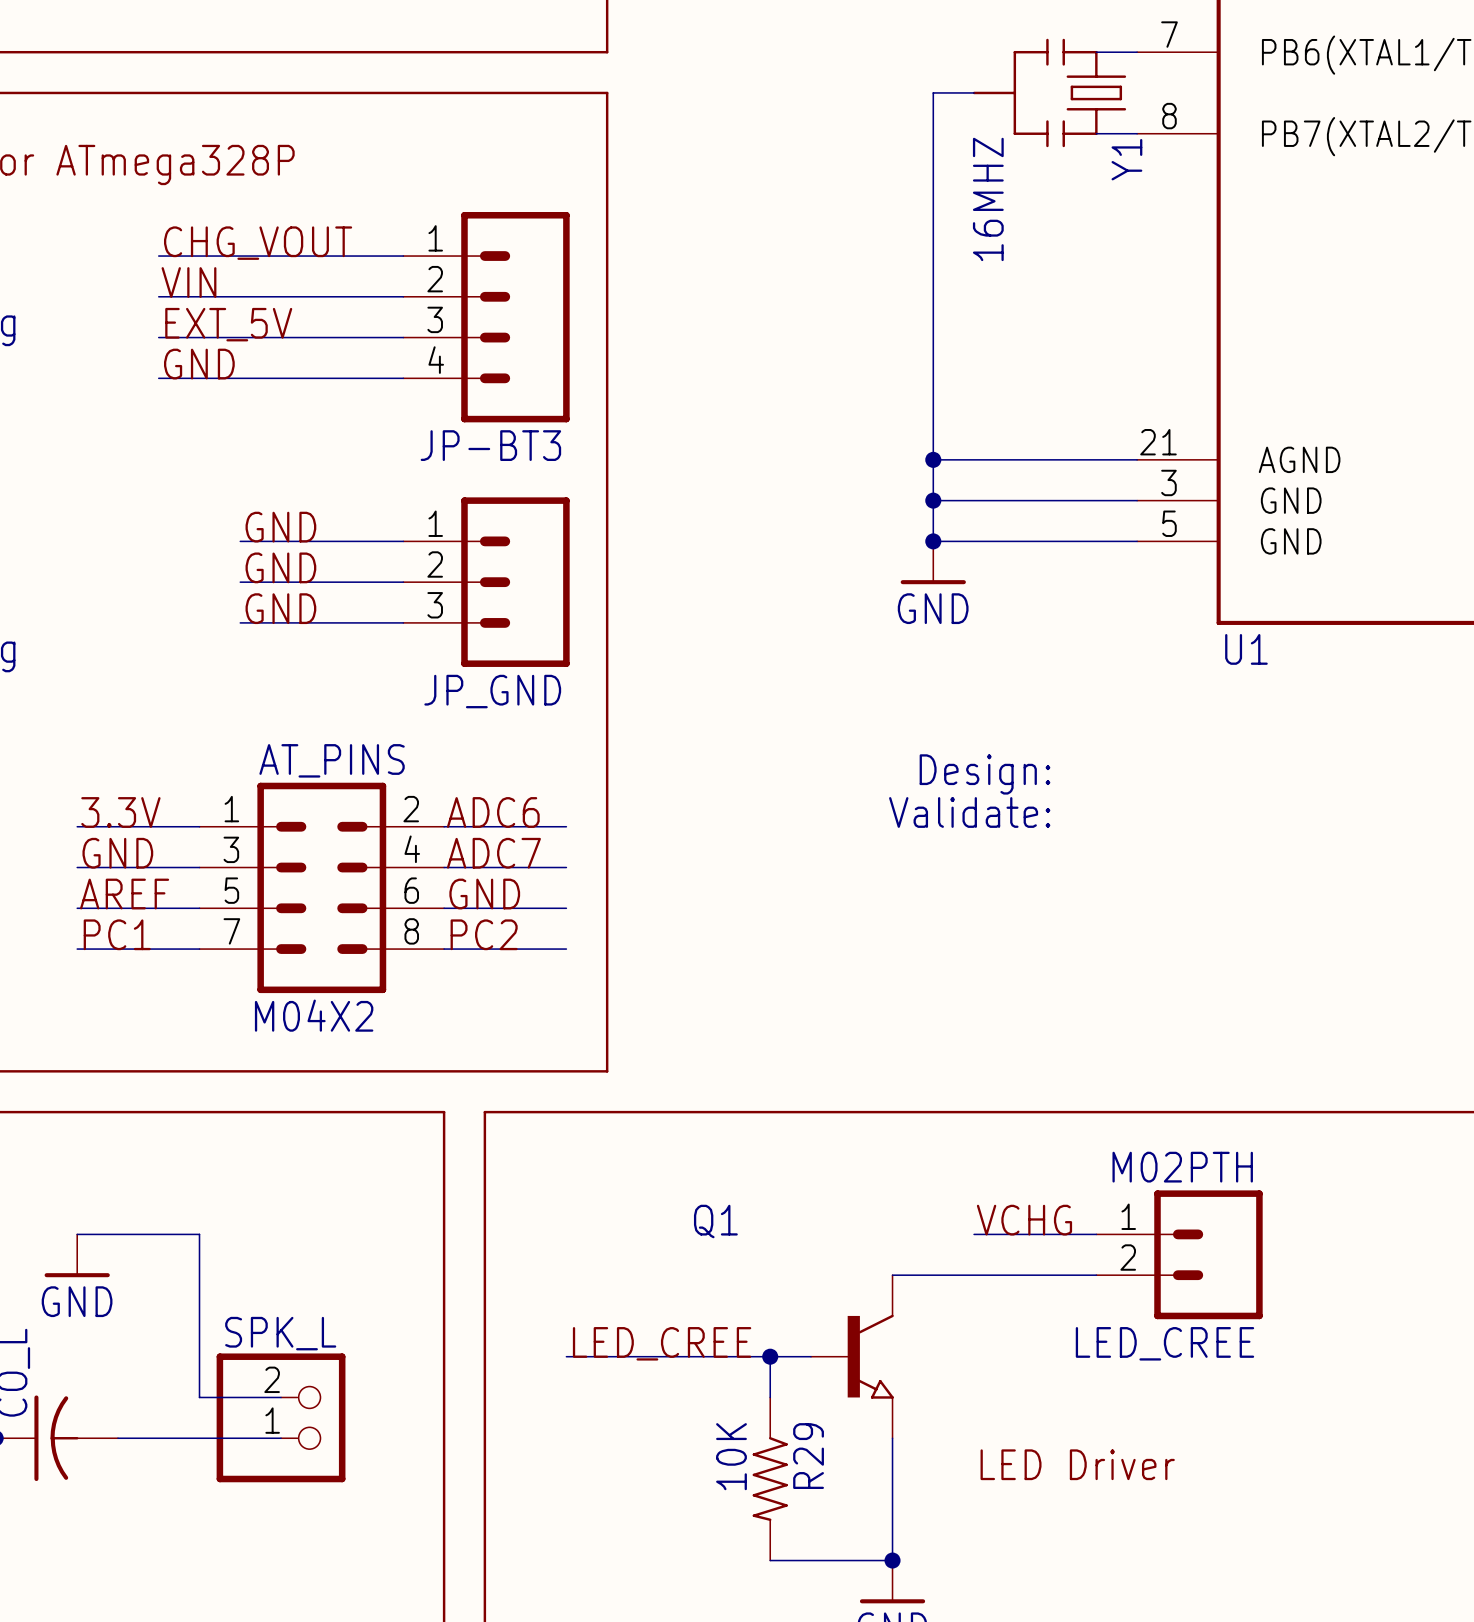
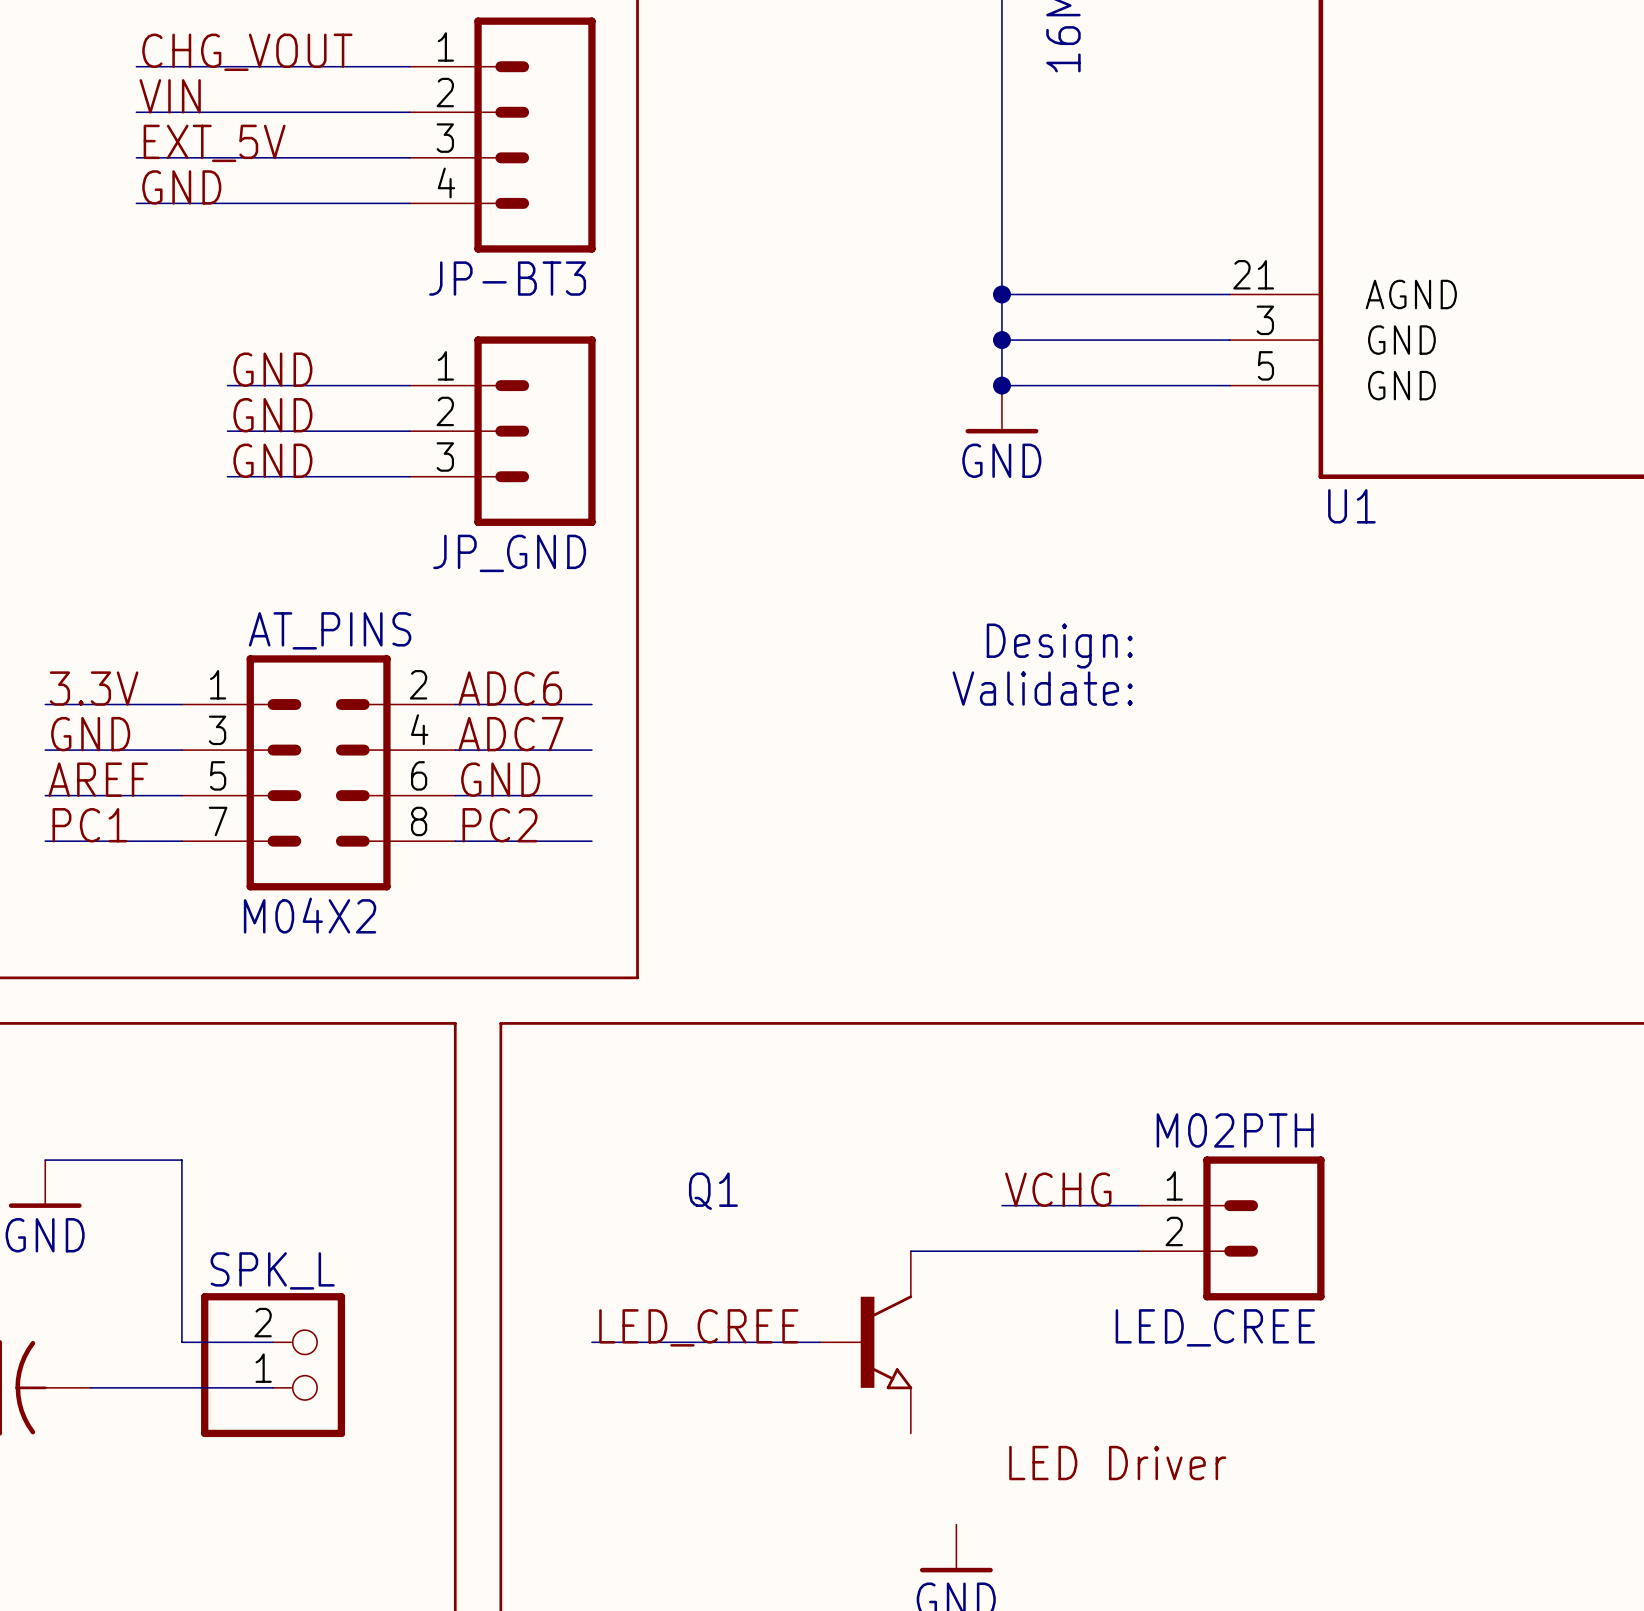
label position: VCHG (1024, 1220) -> VCHG (1058, 1189)
wire: (974, 1234) (1096, 1234) -> none
LED_CREE position: (1179, 1254) -> (1231, 1228)
wire: (892, 1275) (933, 1275) -> none
wire: none -> (910, 1251) (1138, 1251)
label position: LED_CREE (662, 1343) -> LED_CREE (698, 1327)
wire: (566, 1356) (810, 1356) -> none
wire: (770, 1356) (770, 1397) -> (591, 1342) (819, 1342)
junction: (770, 1356) -> none
Q1 position: (852, 1356) -> (865, 1342)
wire: (892, 1438) (892, 1560) (770, 1560) -> none
text position: LED Driver (1077, 1464) -> LED Driver (1117, 1463)
R29: 10K (770, 1479) -> none
junction: (892, 1560) -> none

